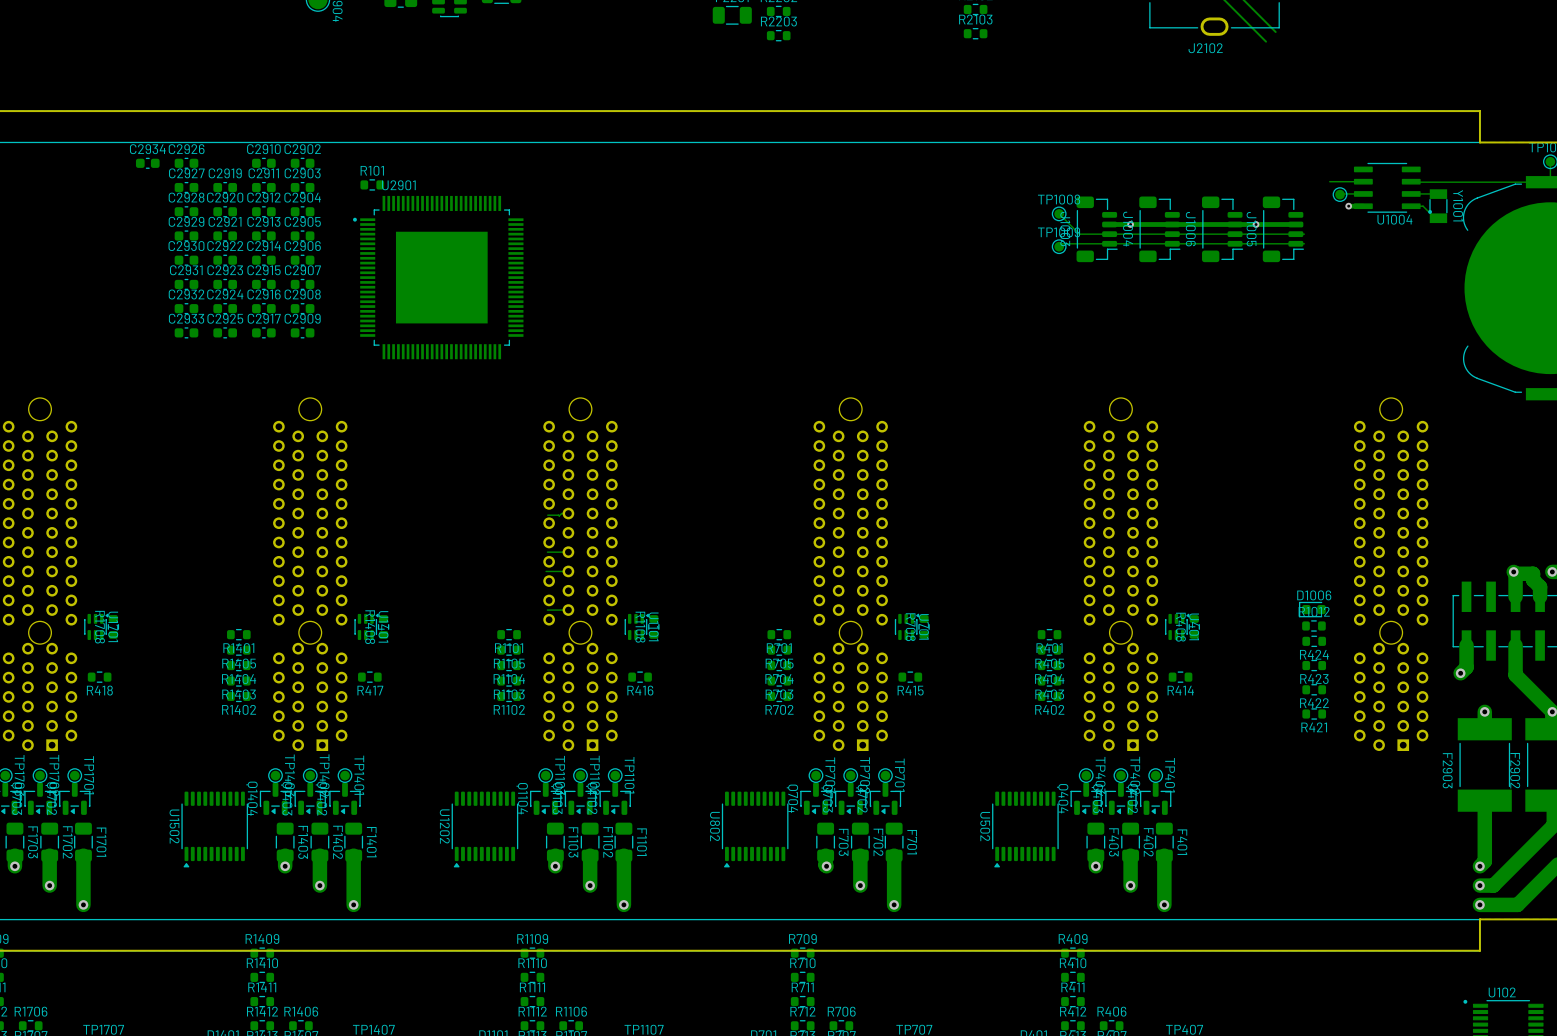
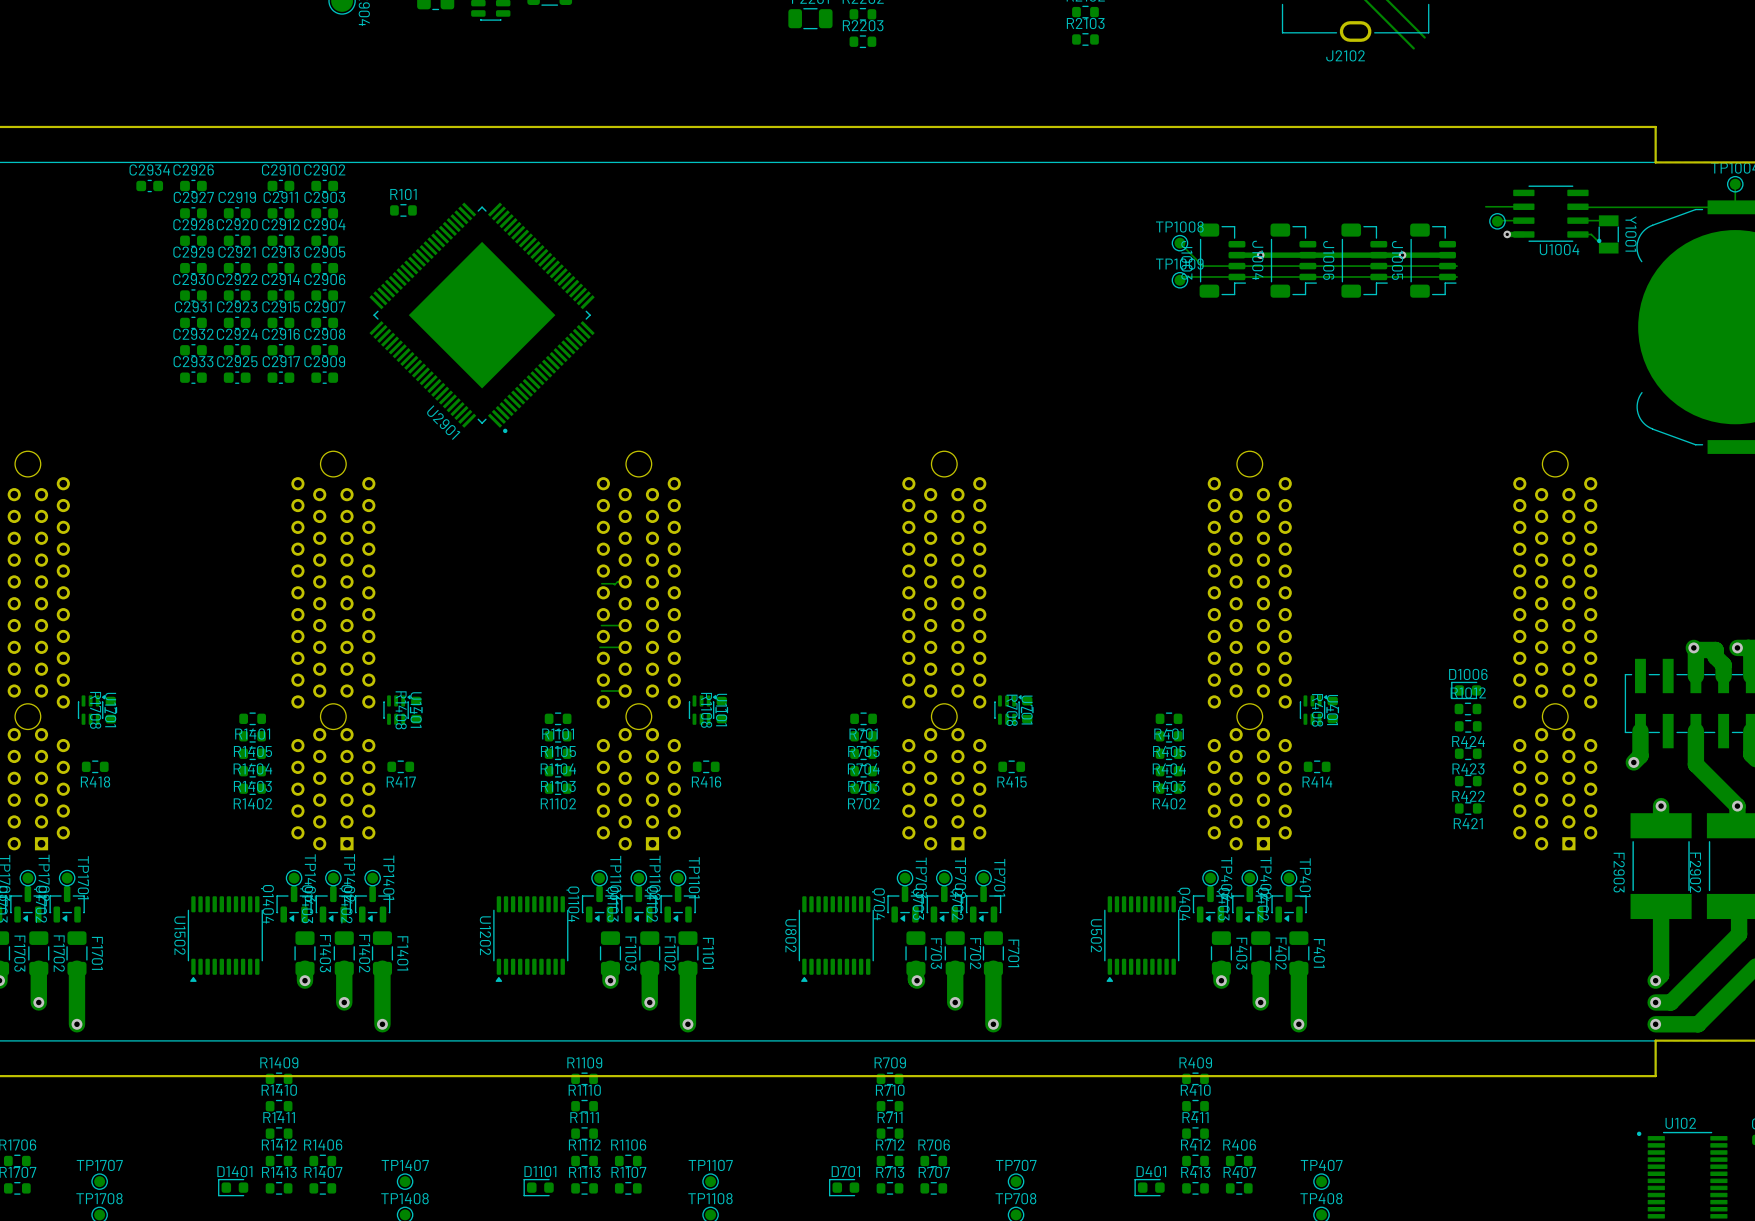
U2901 rotation: 0° (438, 277) -> 135° counterclockwise (482, 317)

